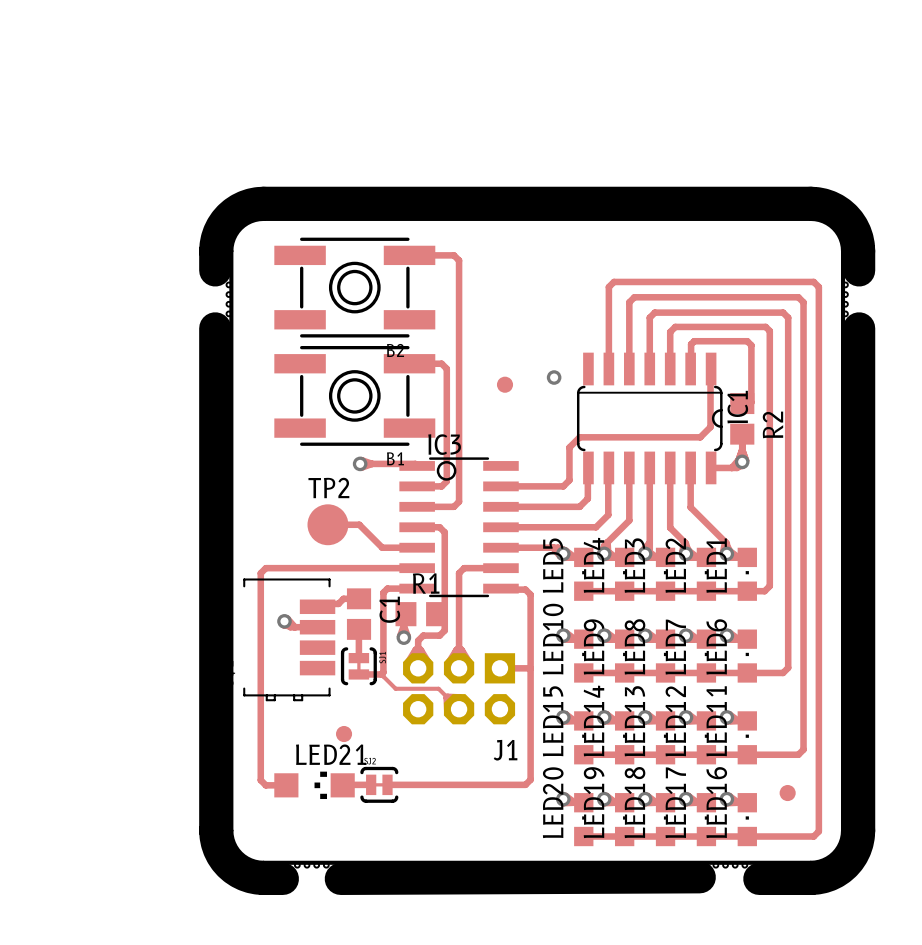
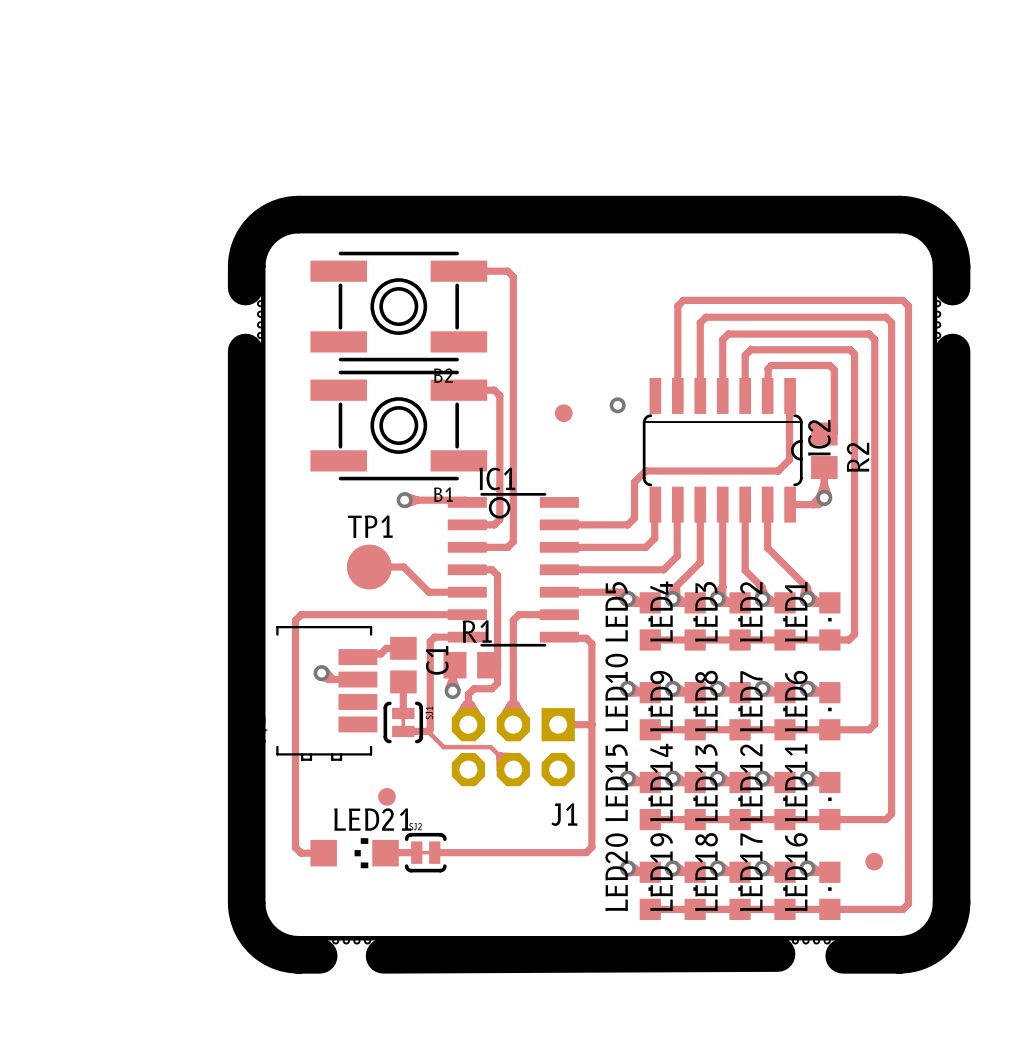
IC1 name: IC1 (737, 407) -> IC2 (819, 437)
IC3 name: IC3 (444, 444) -> IC1 (497, 478)
TP2 name: TP2 (328, 487) -> TP1 (370, 526)

